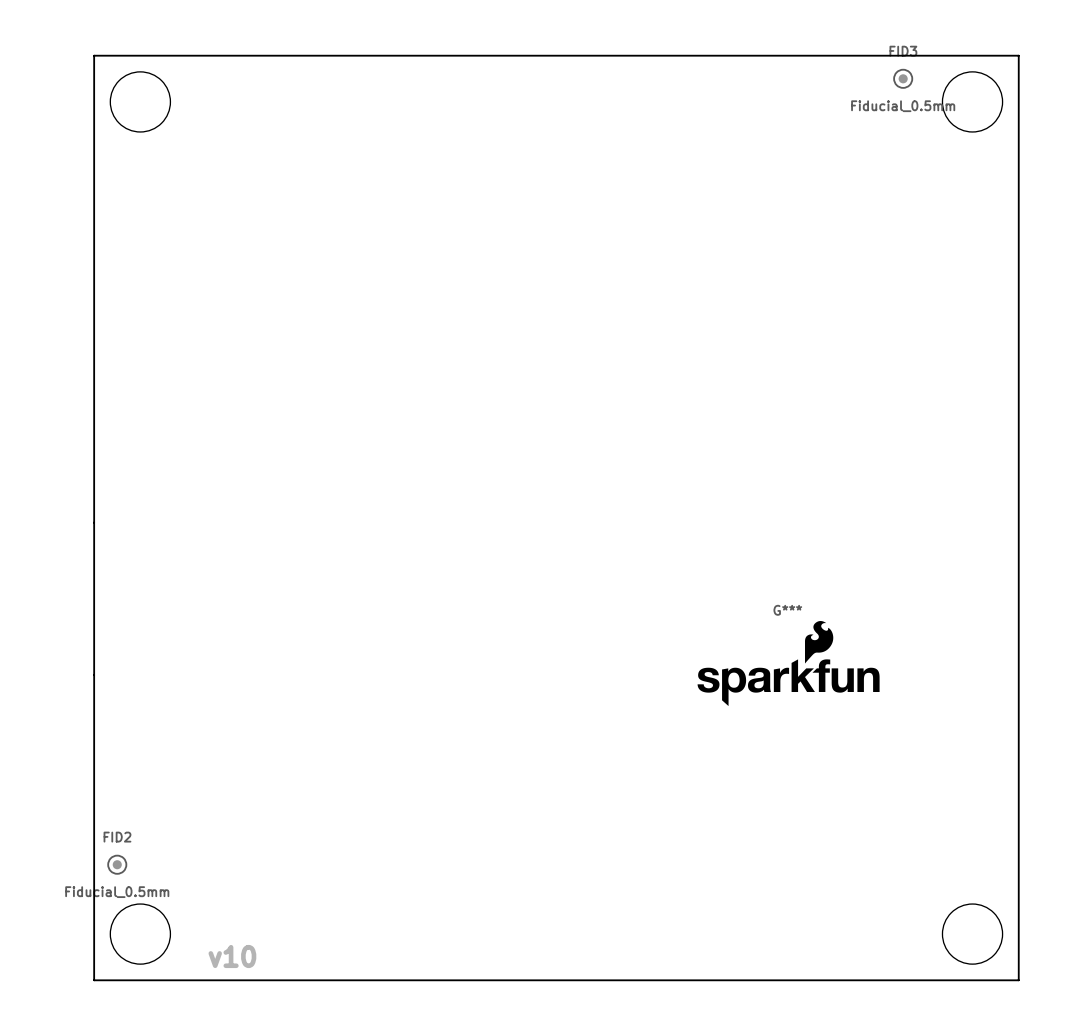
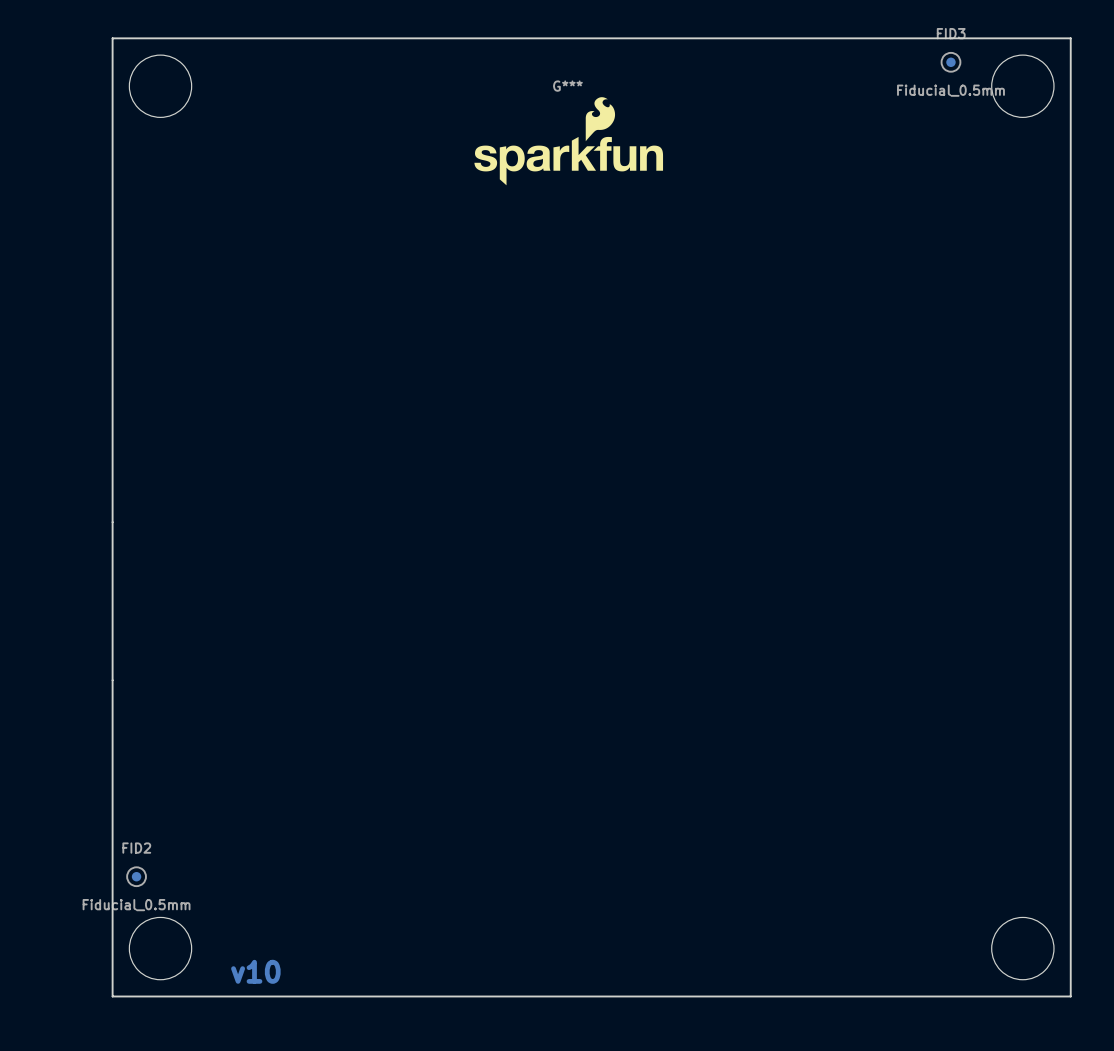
G***: none -> (568, 141)
G***: (788, 663) -> none

